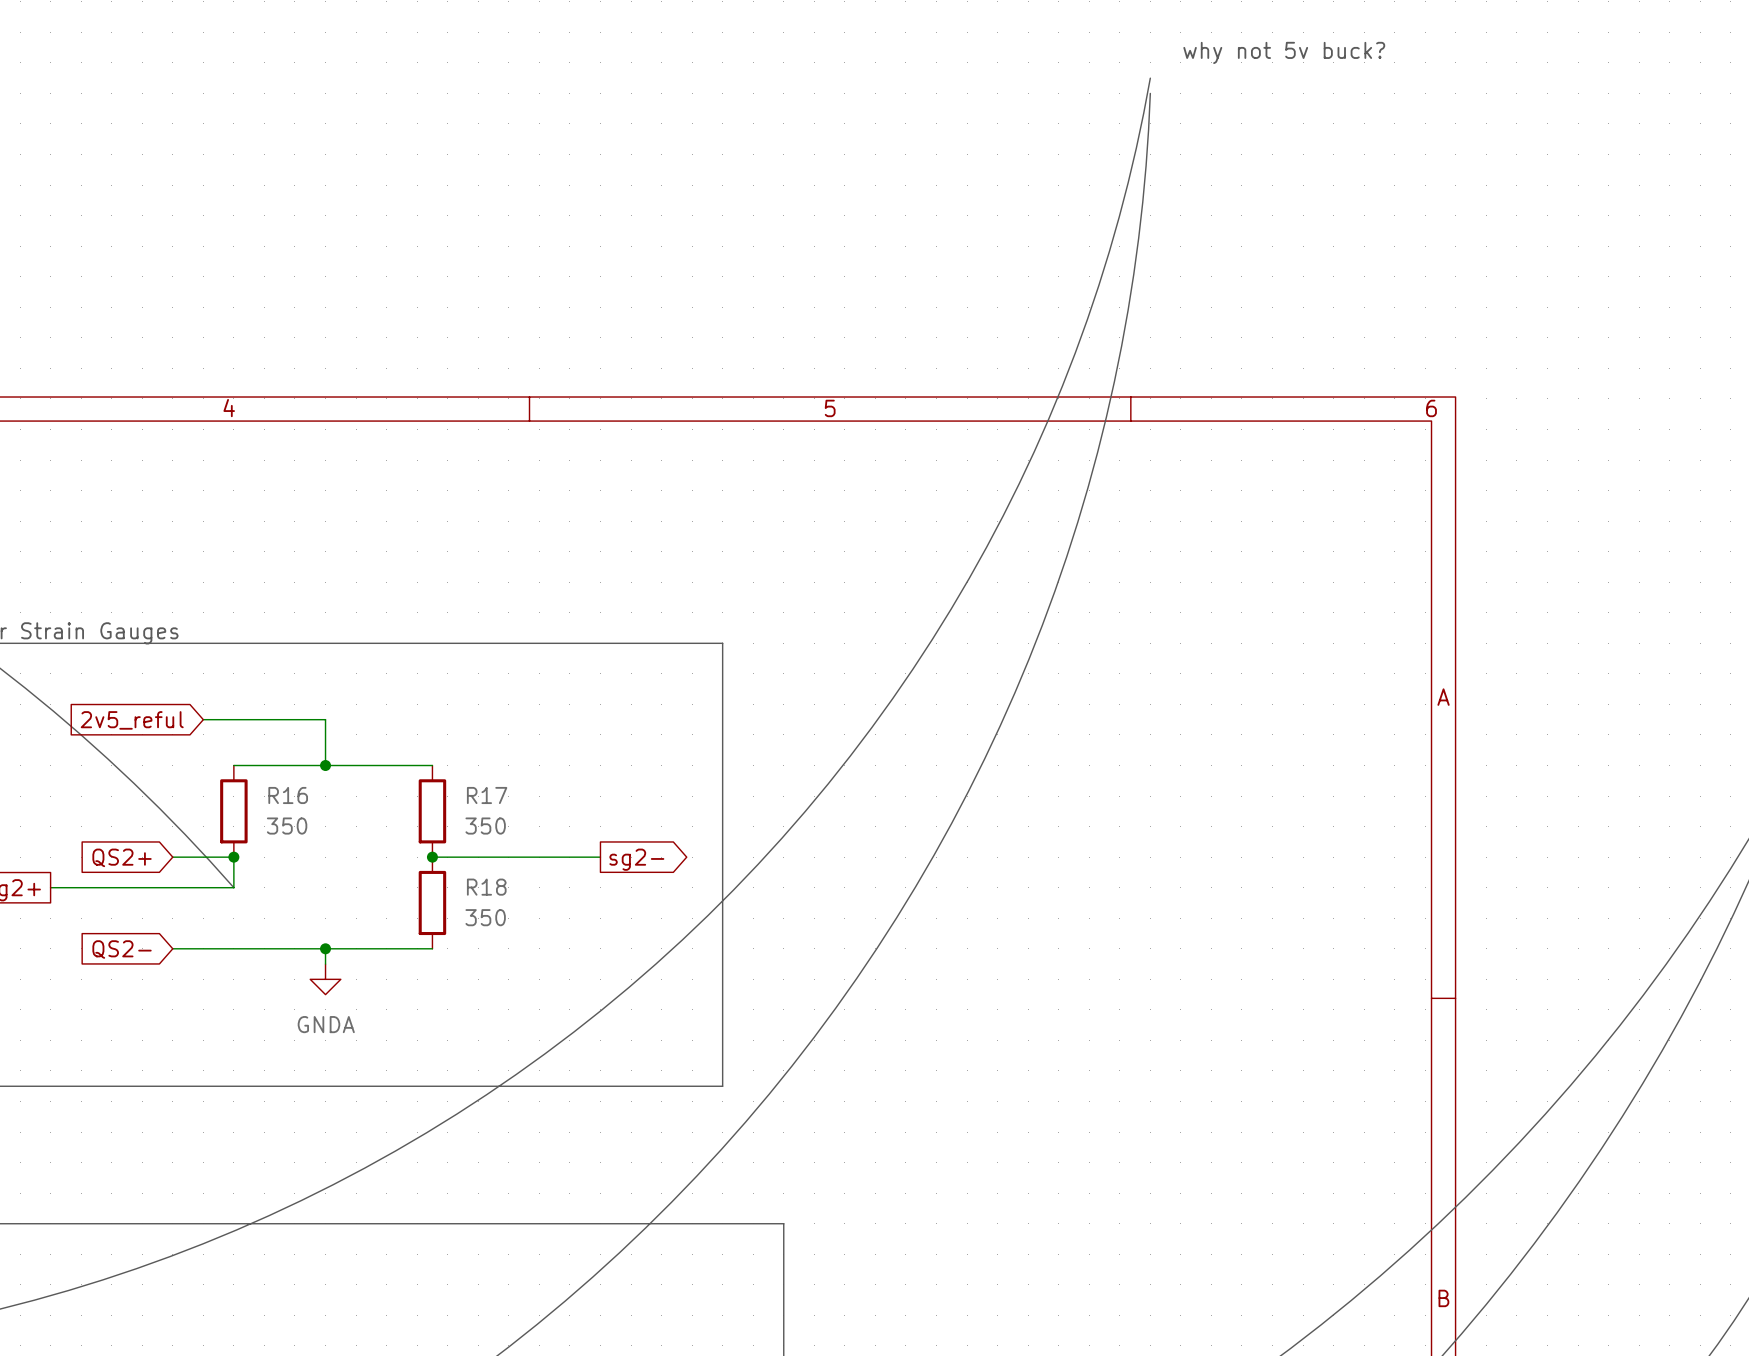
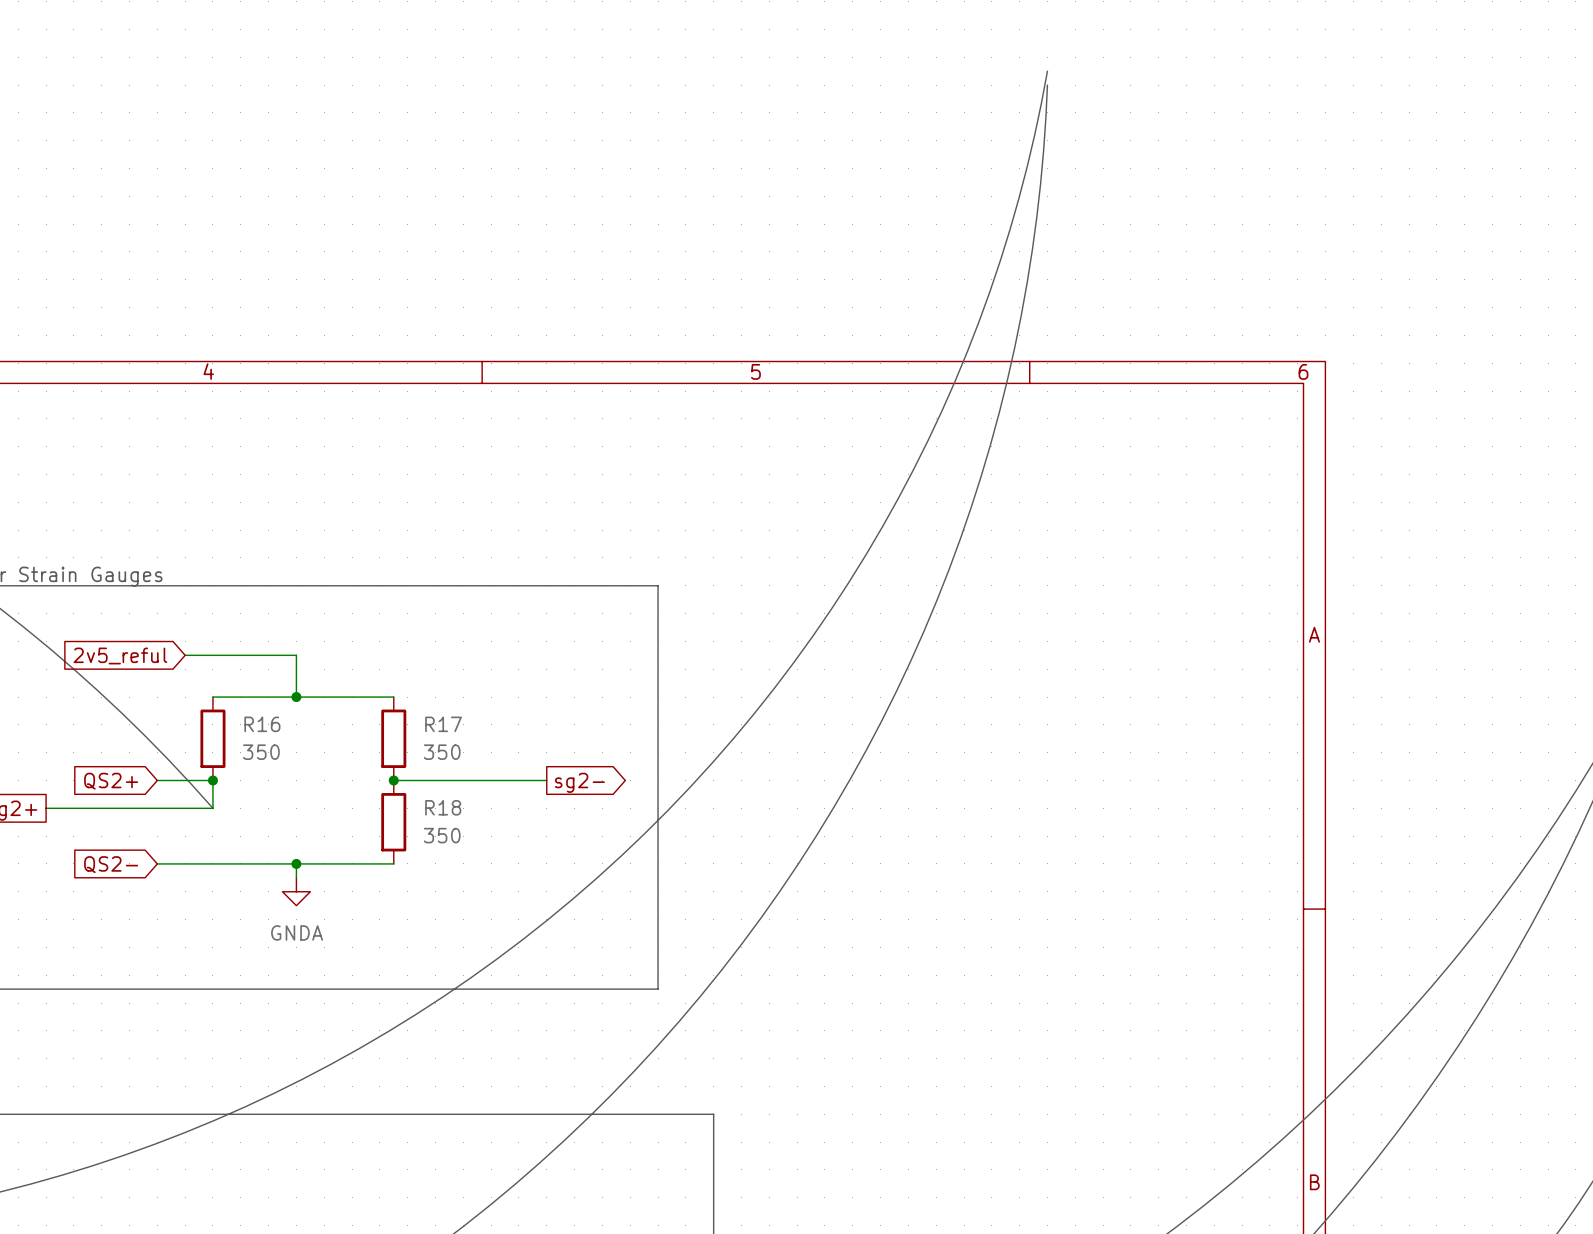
text: why not 5v buck? (1284, 52) -> none

